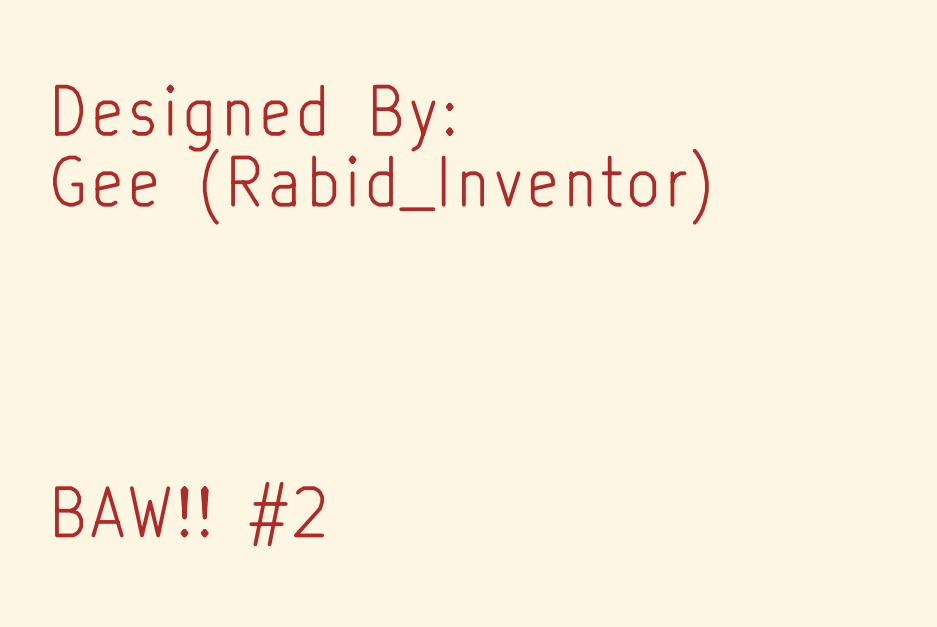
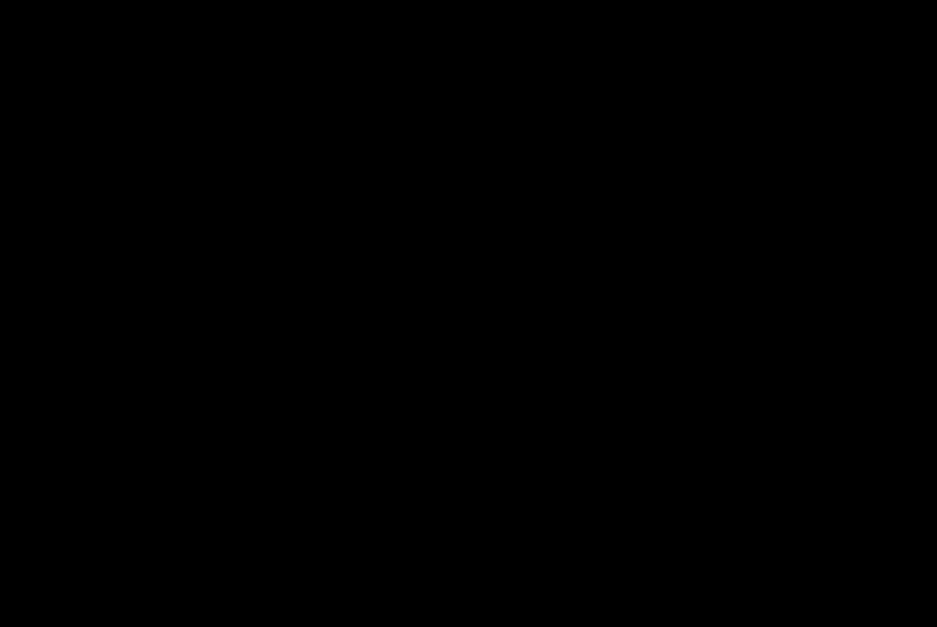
text: Designed By: (254, 118) -> none
text: Gee (Rabid_Inventor) (380, 186) -> none
text: BAW!! #2 (189, 514) -> none

